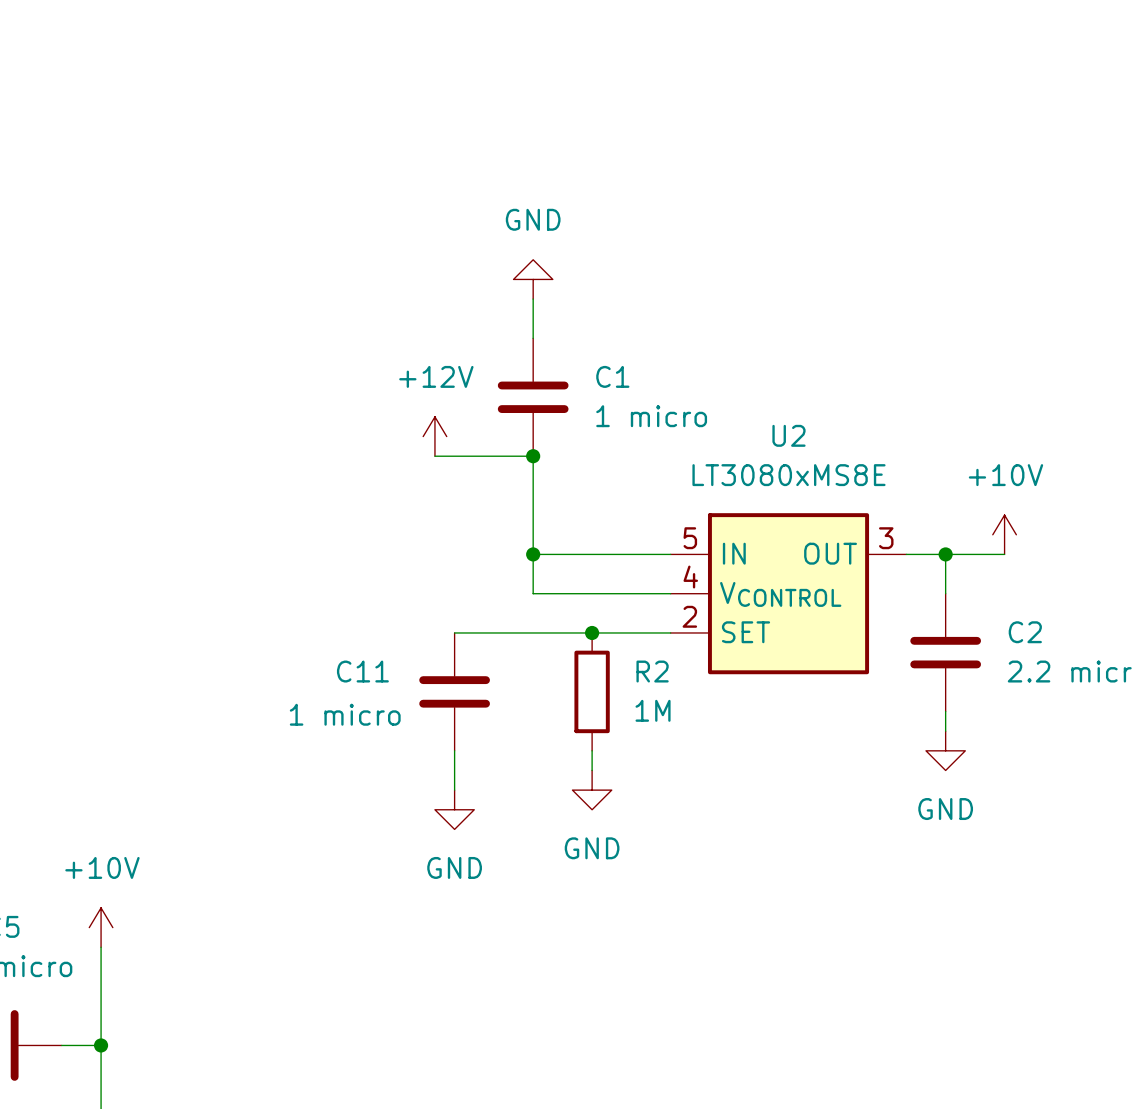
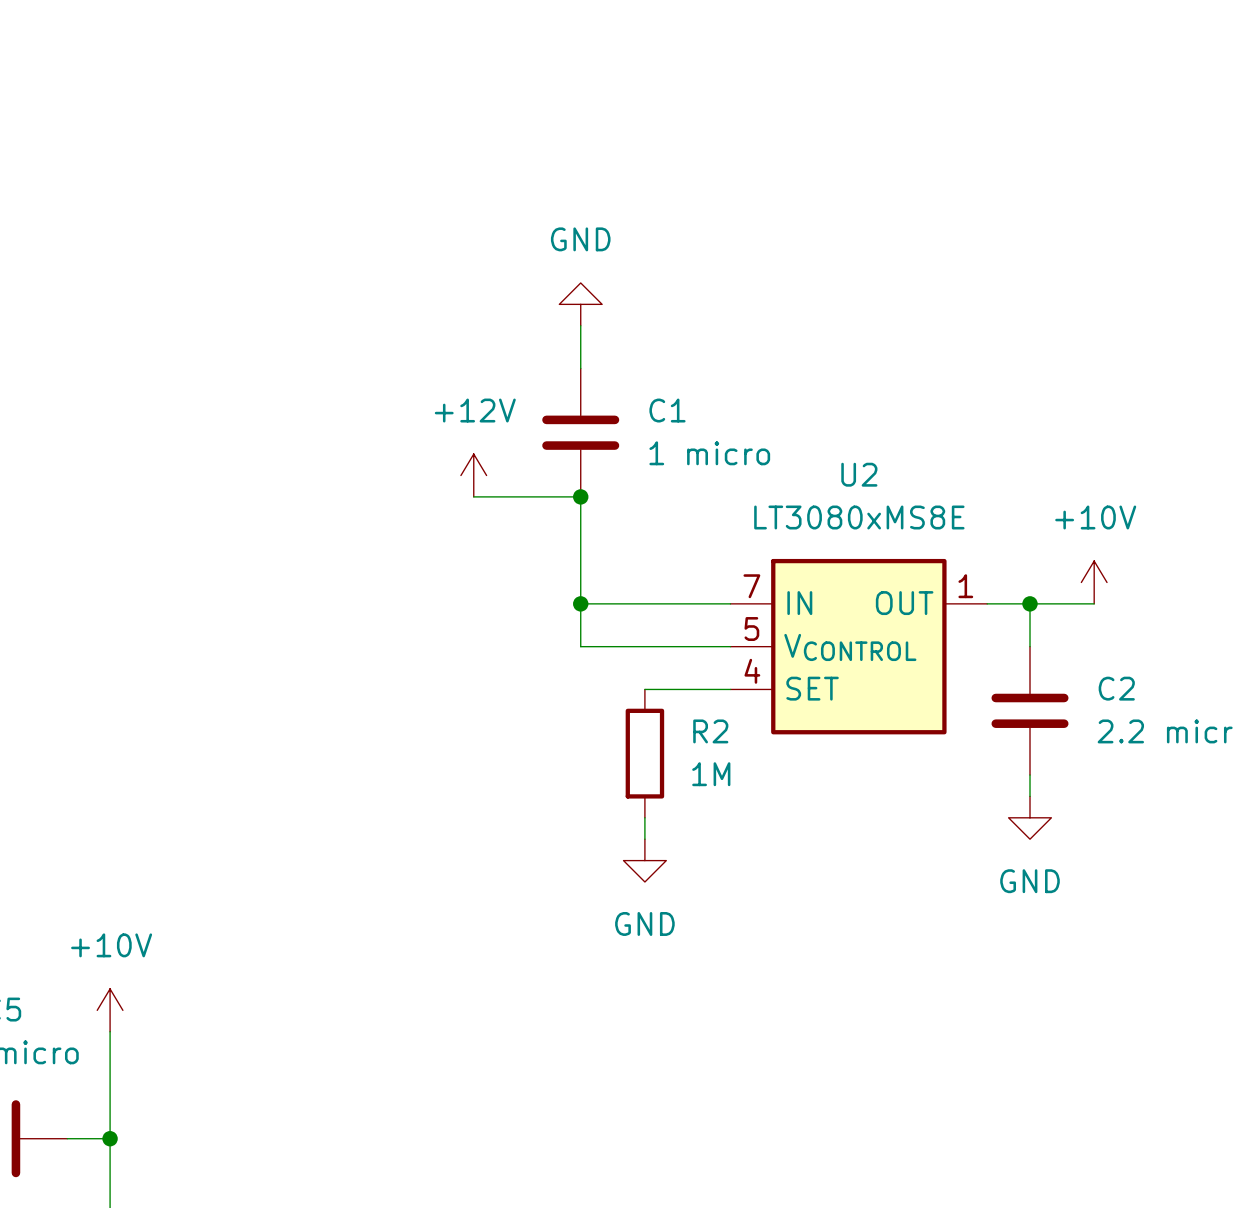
U2 pin number: 5 (690, 538) -> 7 (751, 586)
U2 pin number: 3 (886, 538) -> 1 (965, 586)
U2 pin number: 4 (690, 577) -> 5 (751, 629)
U2 pin number: 2 (689, 616) -> 4 (752, 671)
wire: (454, 632) (592, 632) -> none
junction: (592, 632) -> none
C11: 1 micro (454, 691) -> none
wire: (454, 750) (454, 790) -> none
power symbol: GND (454, 809) -> none

